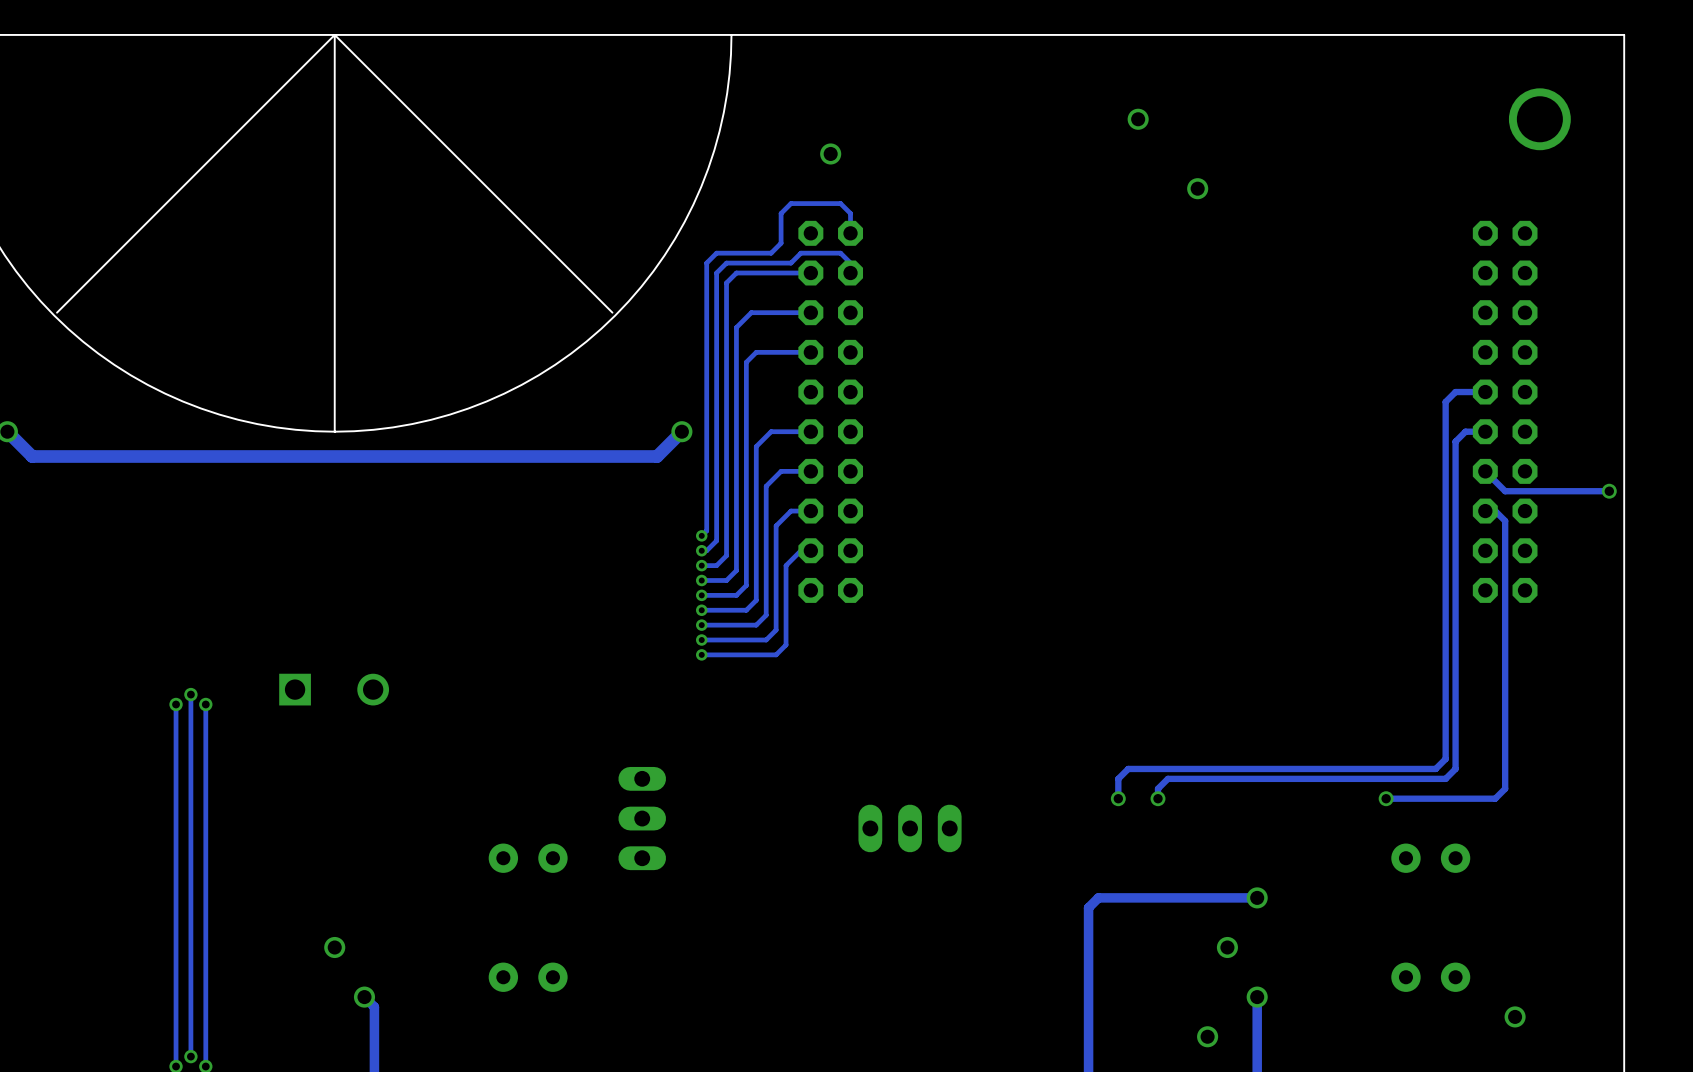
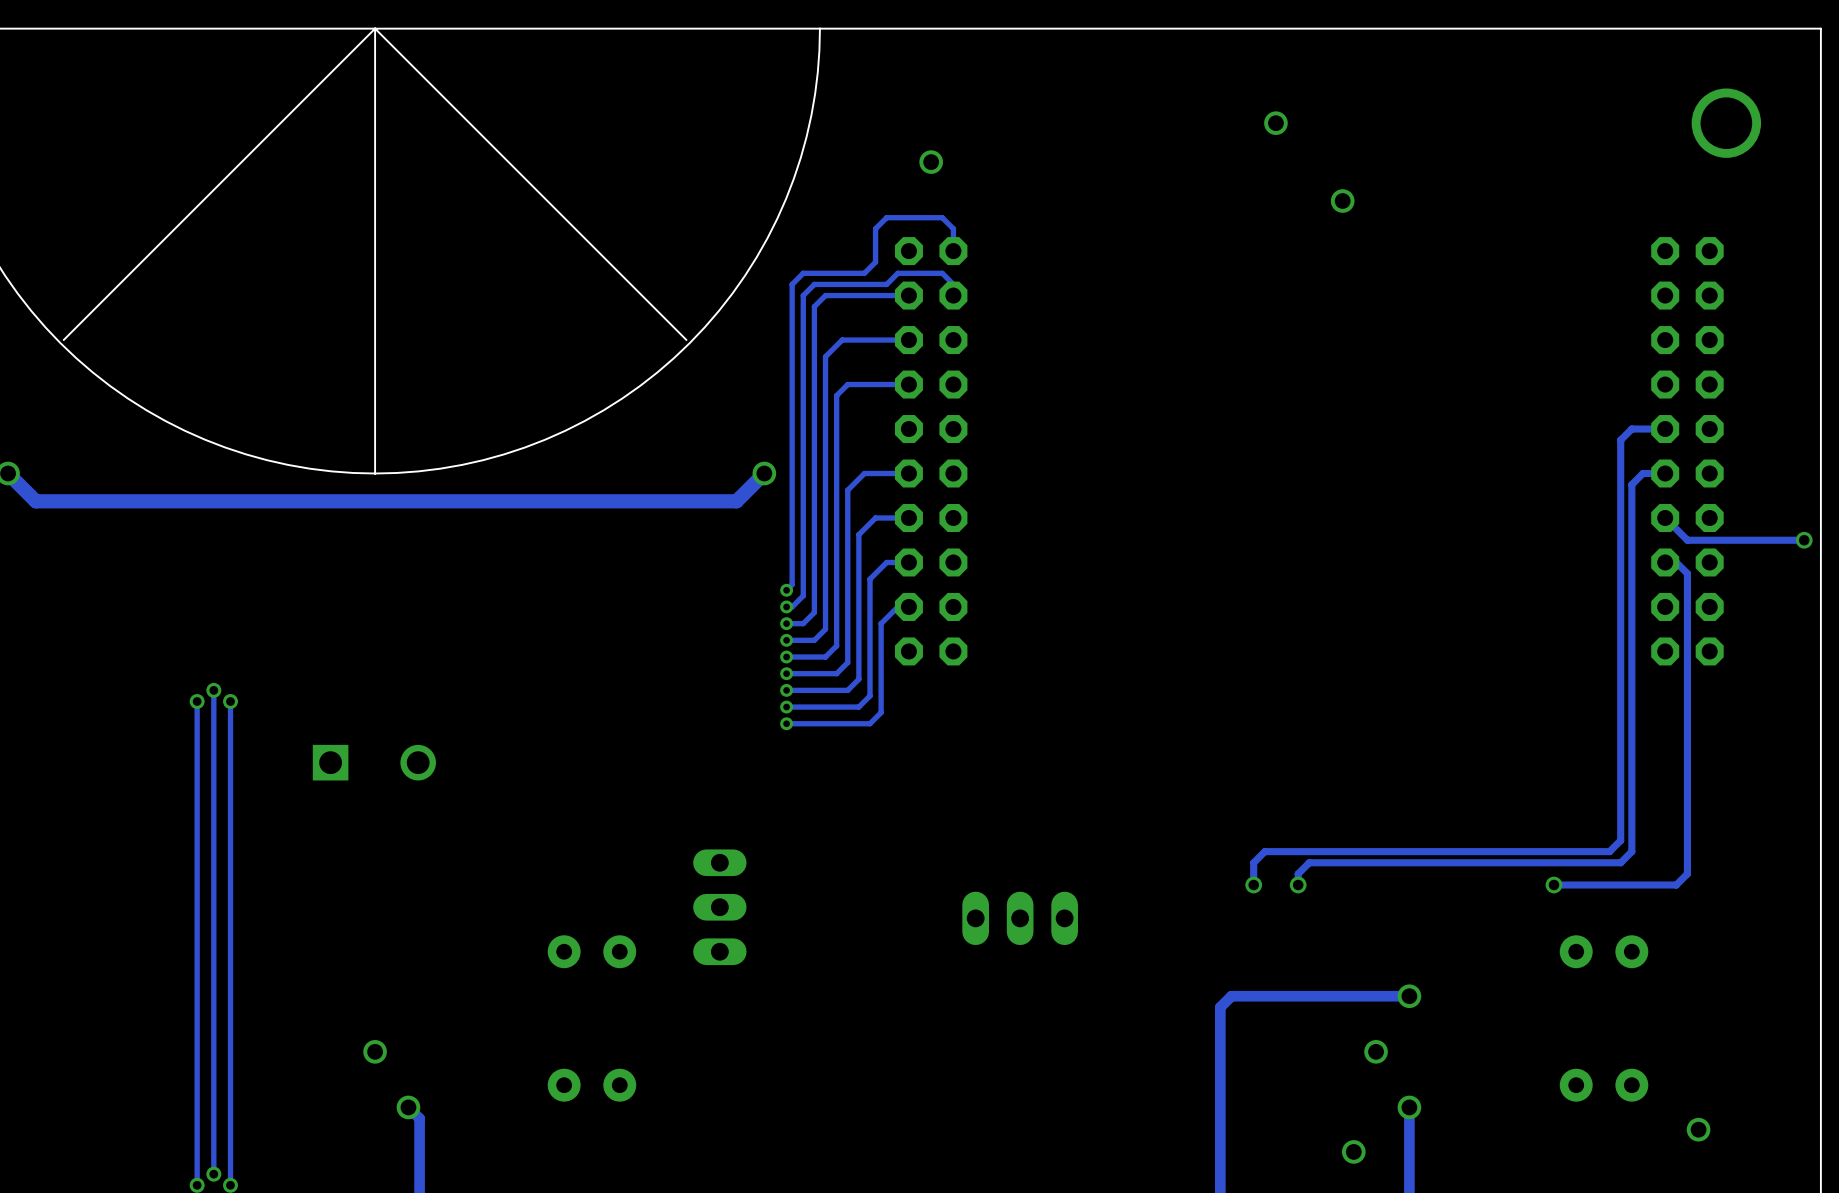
track: none -> (213, 690) (213, 768)
via: none -> (213, 690)
track: none -> (197, 701) (197, 779)
via: none -> (197, 701)
track: none -> (230, 701) (230, 779)
via: none -> (230, 701)
via: (190, 694) -> none
via: (176, 704) -> none
via: (205, 704) -> none

